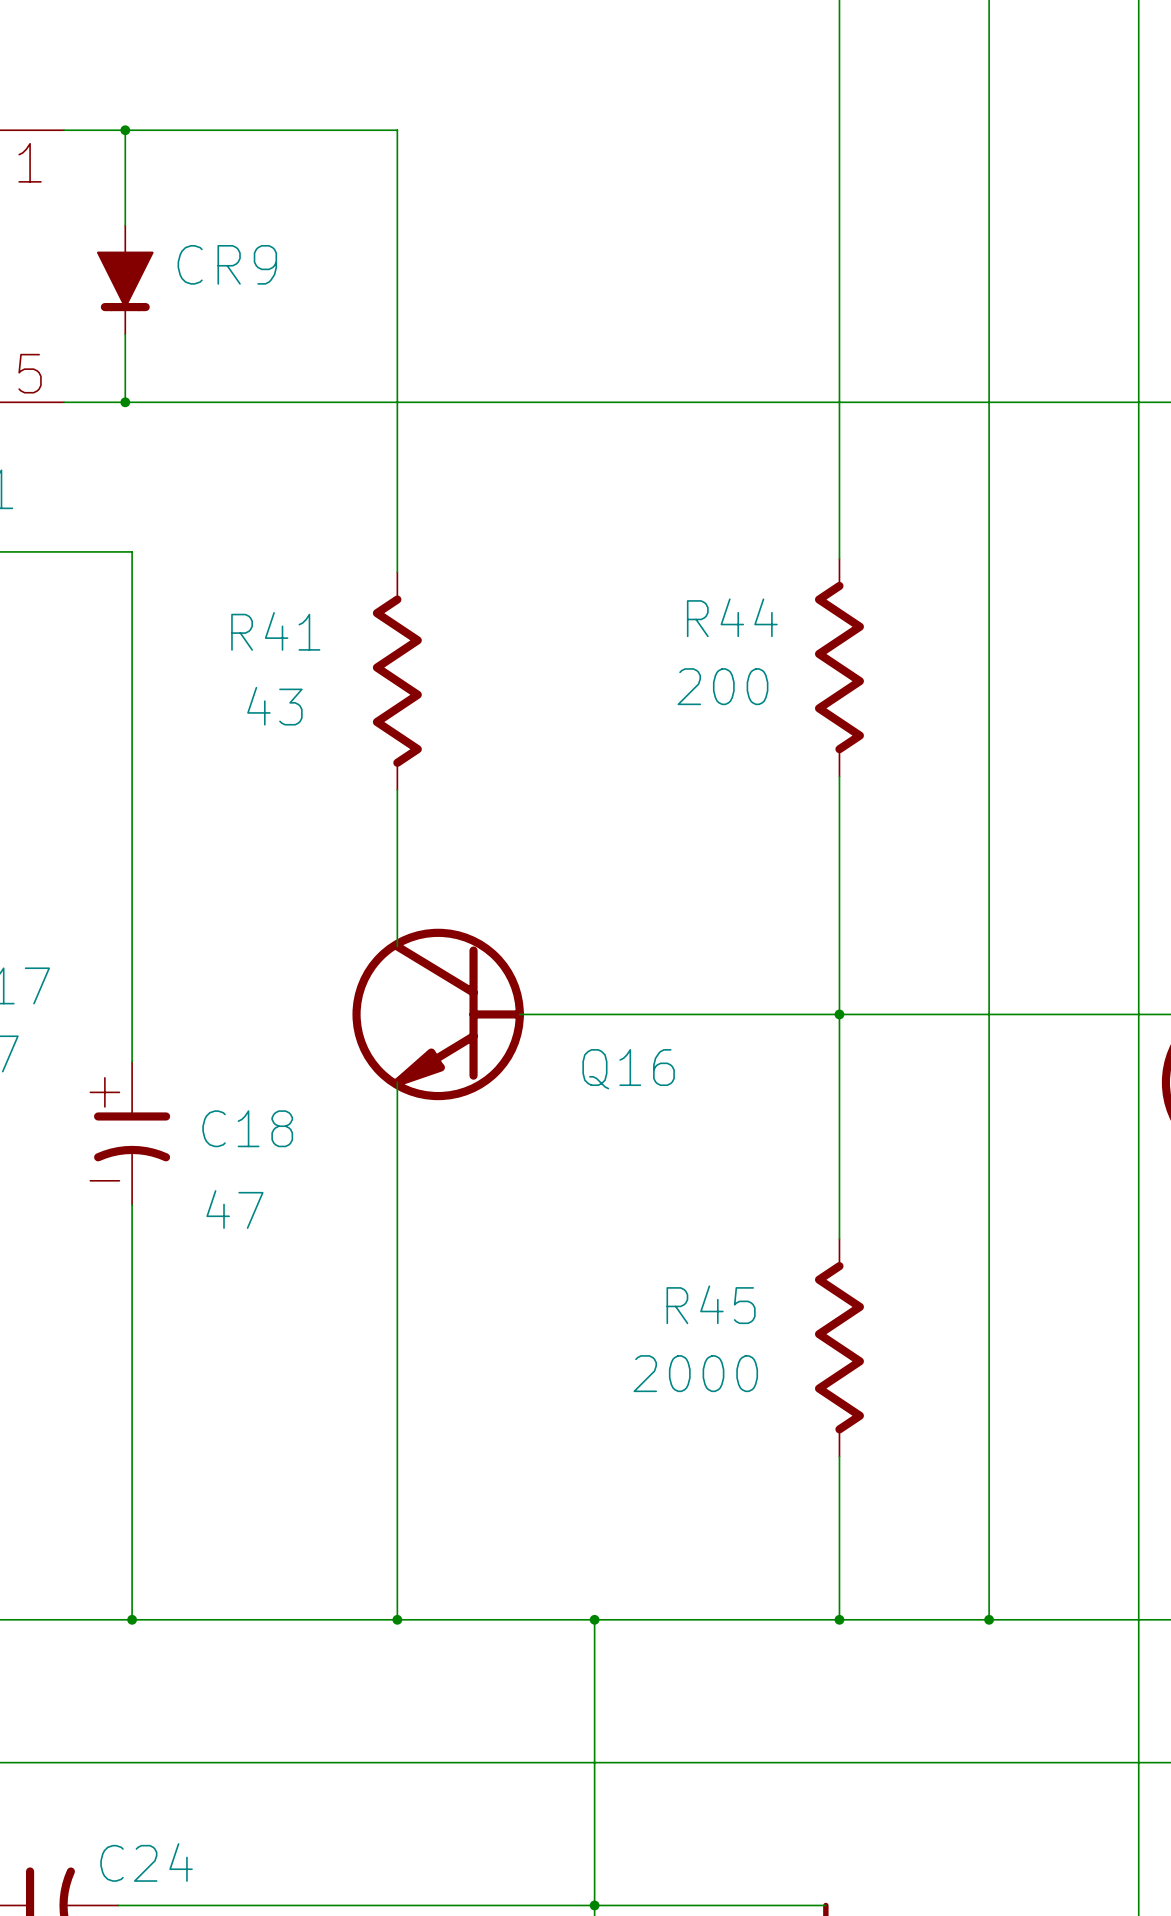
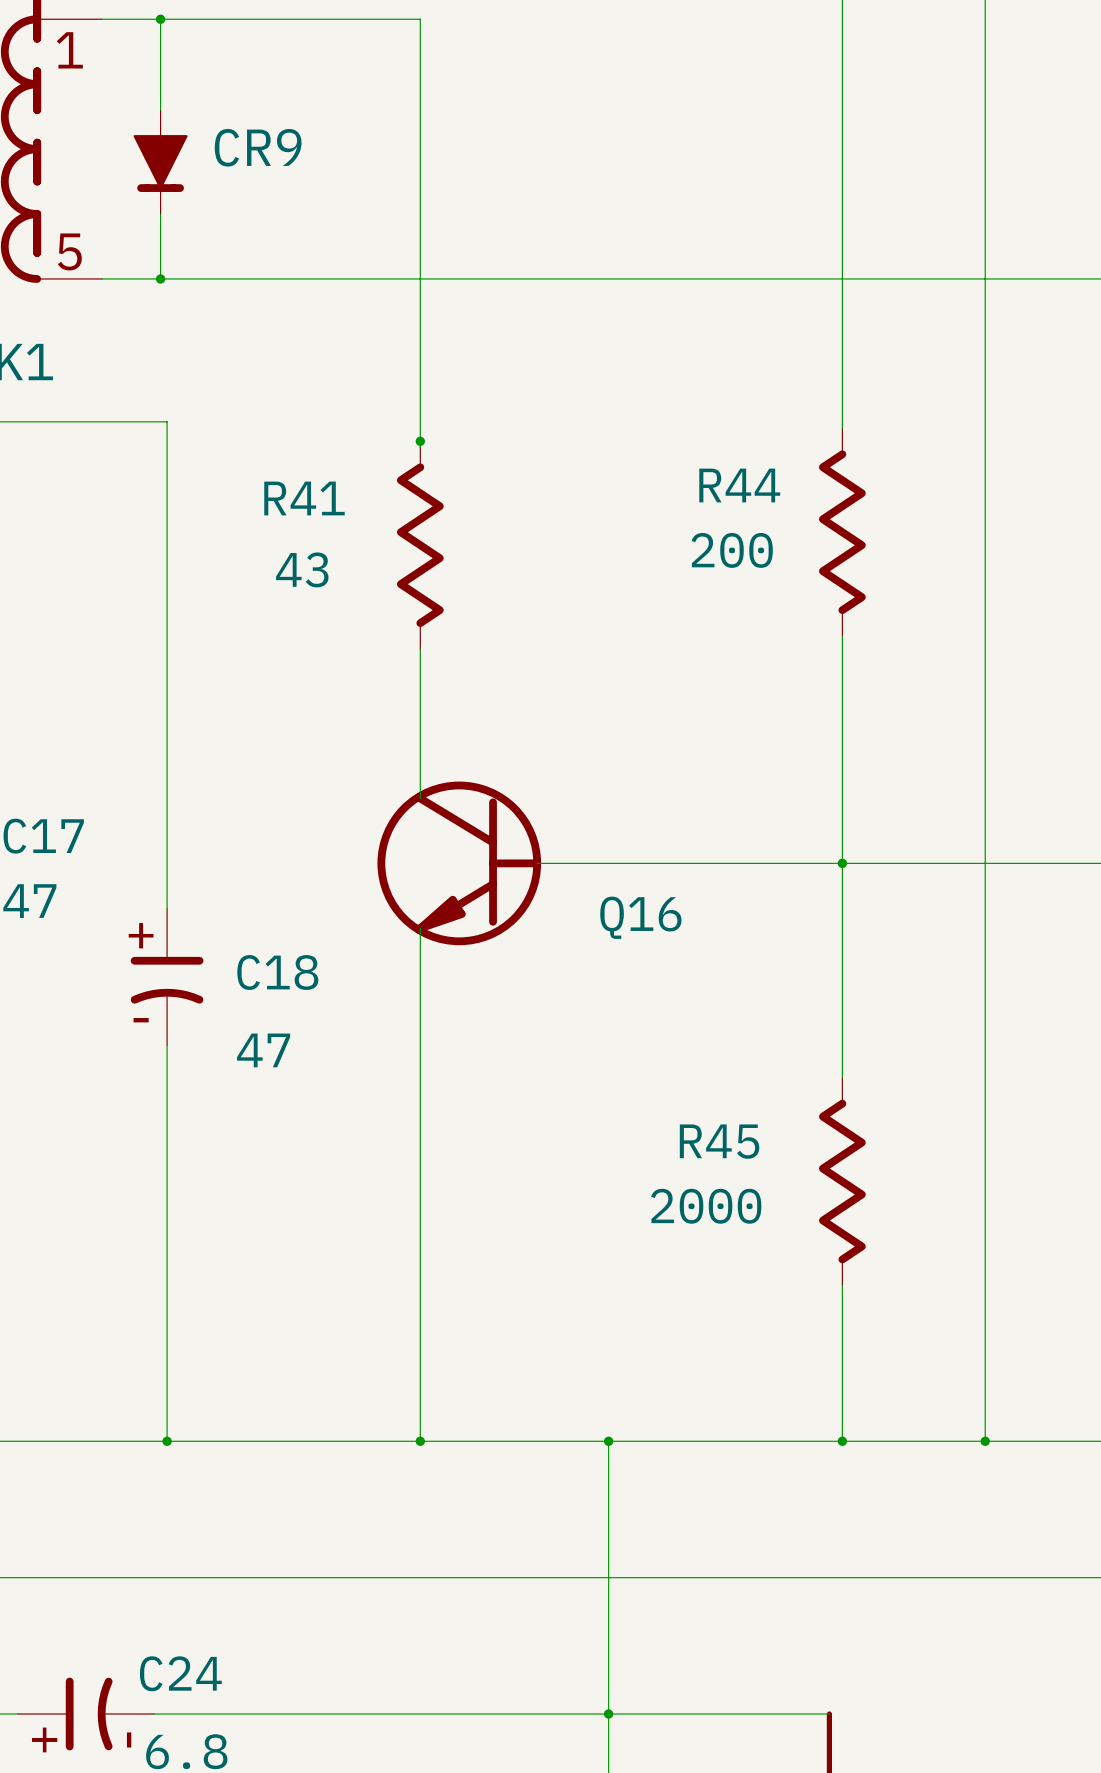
junction: none -> (420, 441)

